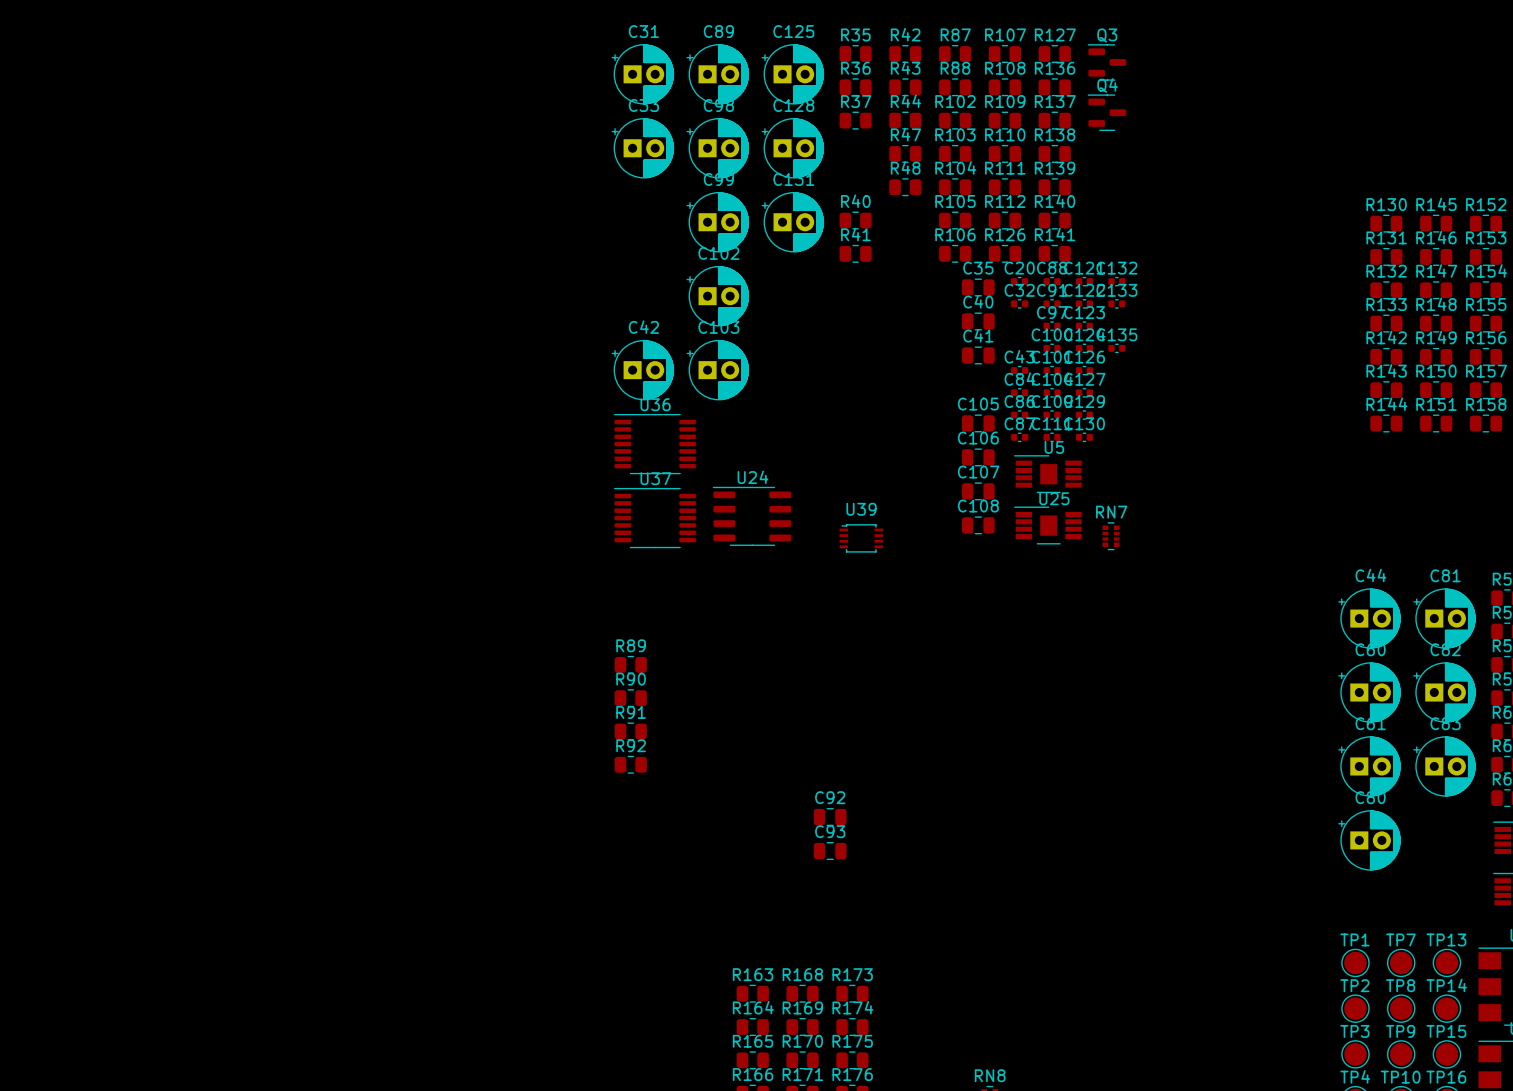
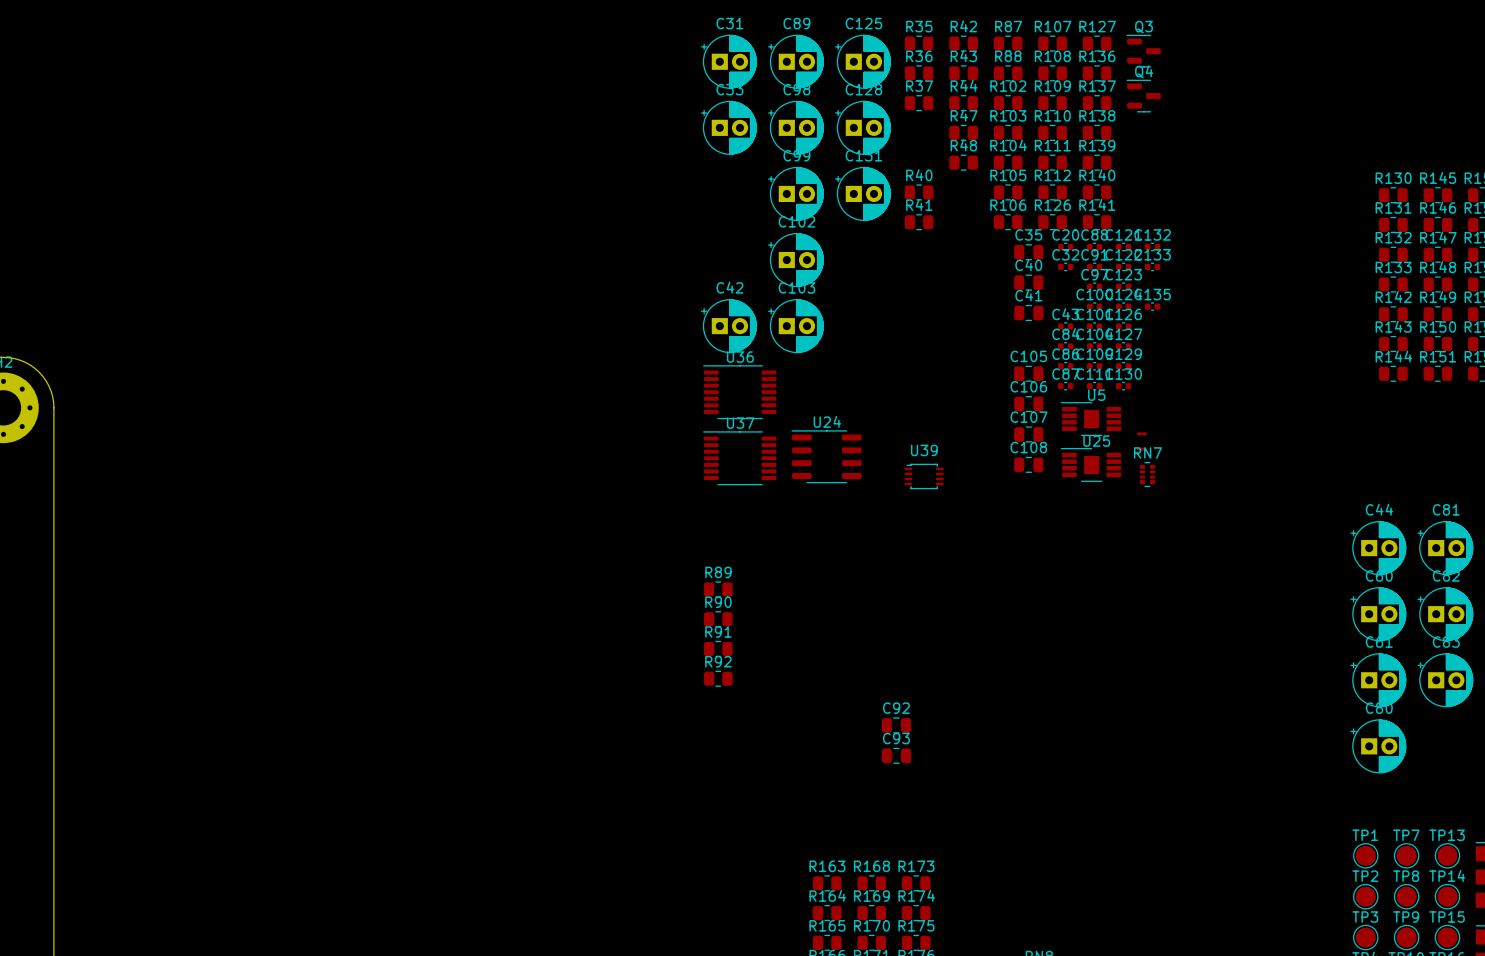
part: none -> (1141, 433)
part: none -> (1141, 449)

